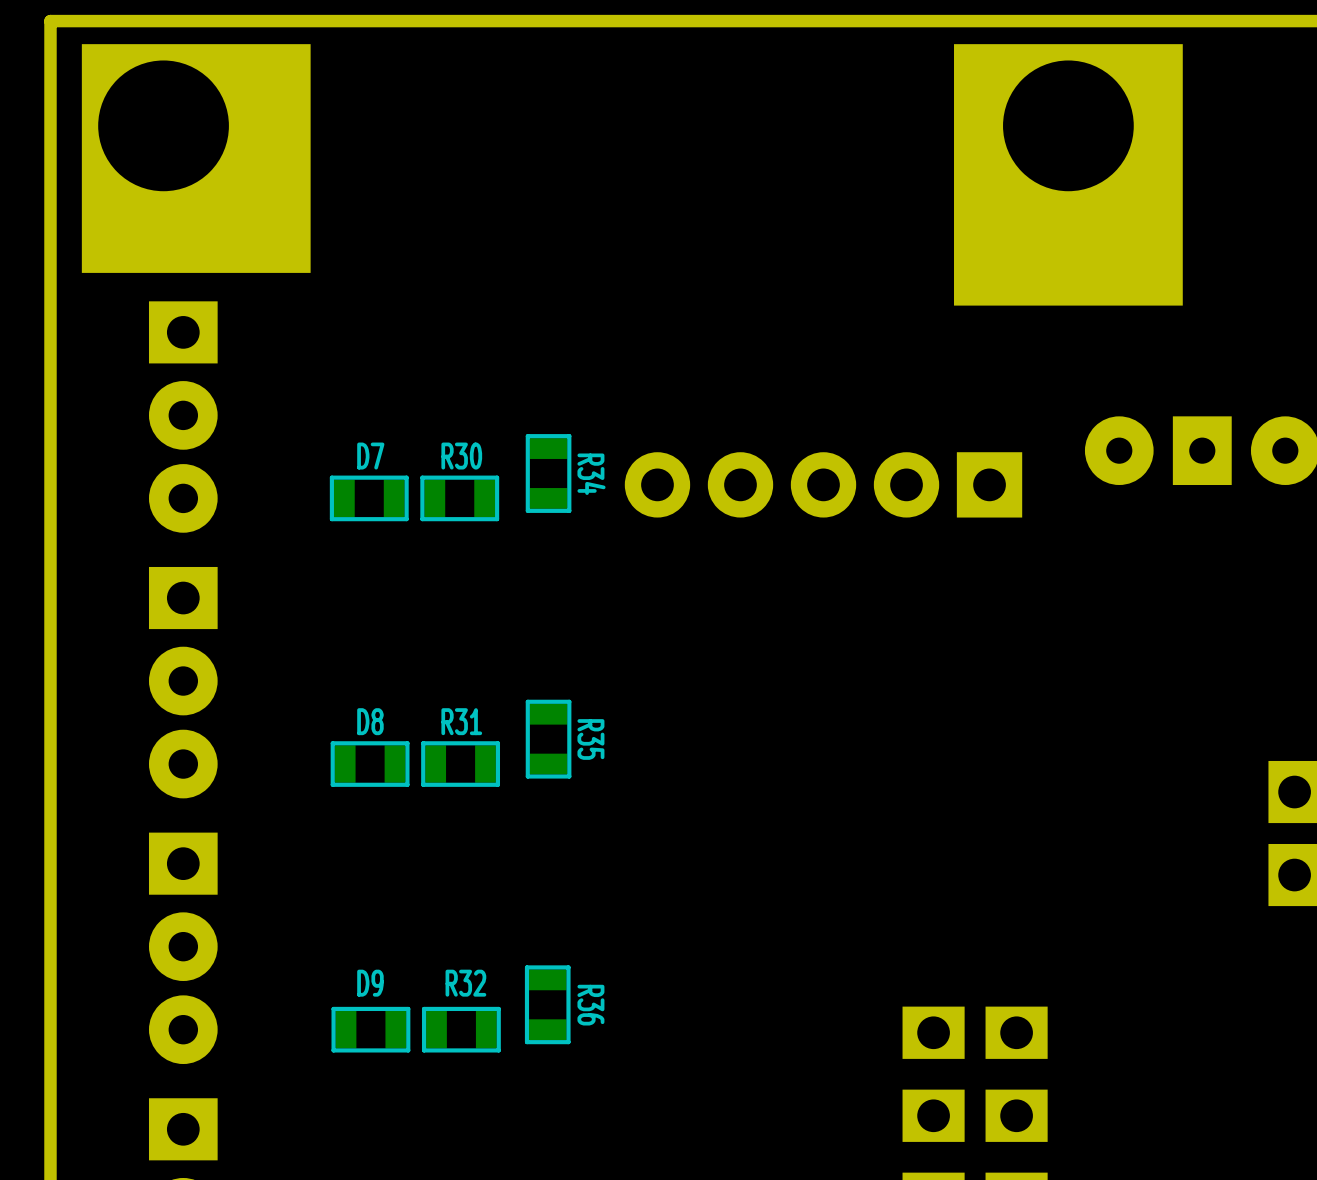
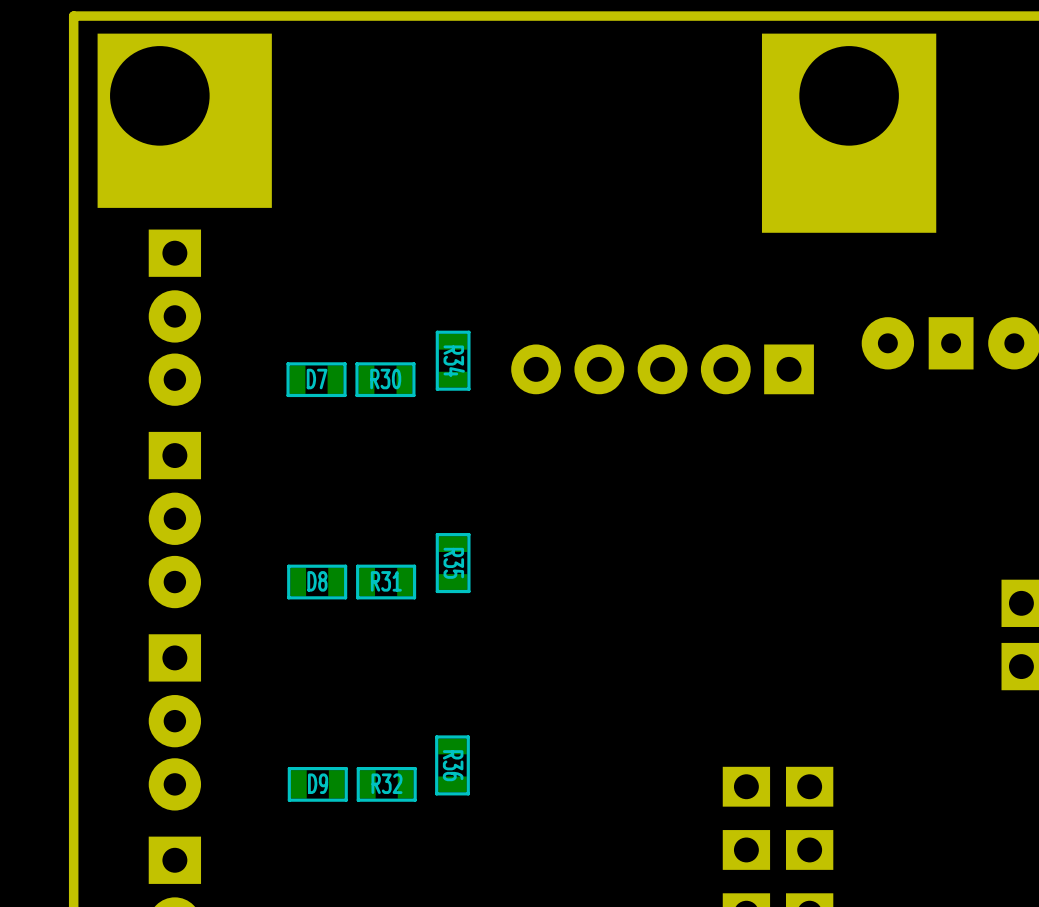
D7 name position: D7 (370, 456) -> D7 (317, 379)
R30 name position: R30 (461, 456) -> R30 (385, 379)
R34 name position: R34 (591, 474) -> R34 (454, 361)
D8 name position: D8 (370, 721) -> D8 (317, 581)
R31 name position: R31 (461, 721) -> R31 (386, 581)
R35 name position: R35 (590, 739) -> R35 (453, 563)
D9 name position: D9 (370, 983) -> D9 (318, 783)
R32 name position: R32 (465, 983) -> R32 (386, 783)
R36 name position: R36 (590, 1005) -> R36 (453, 765)

